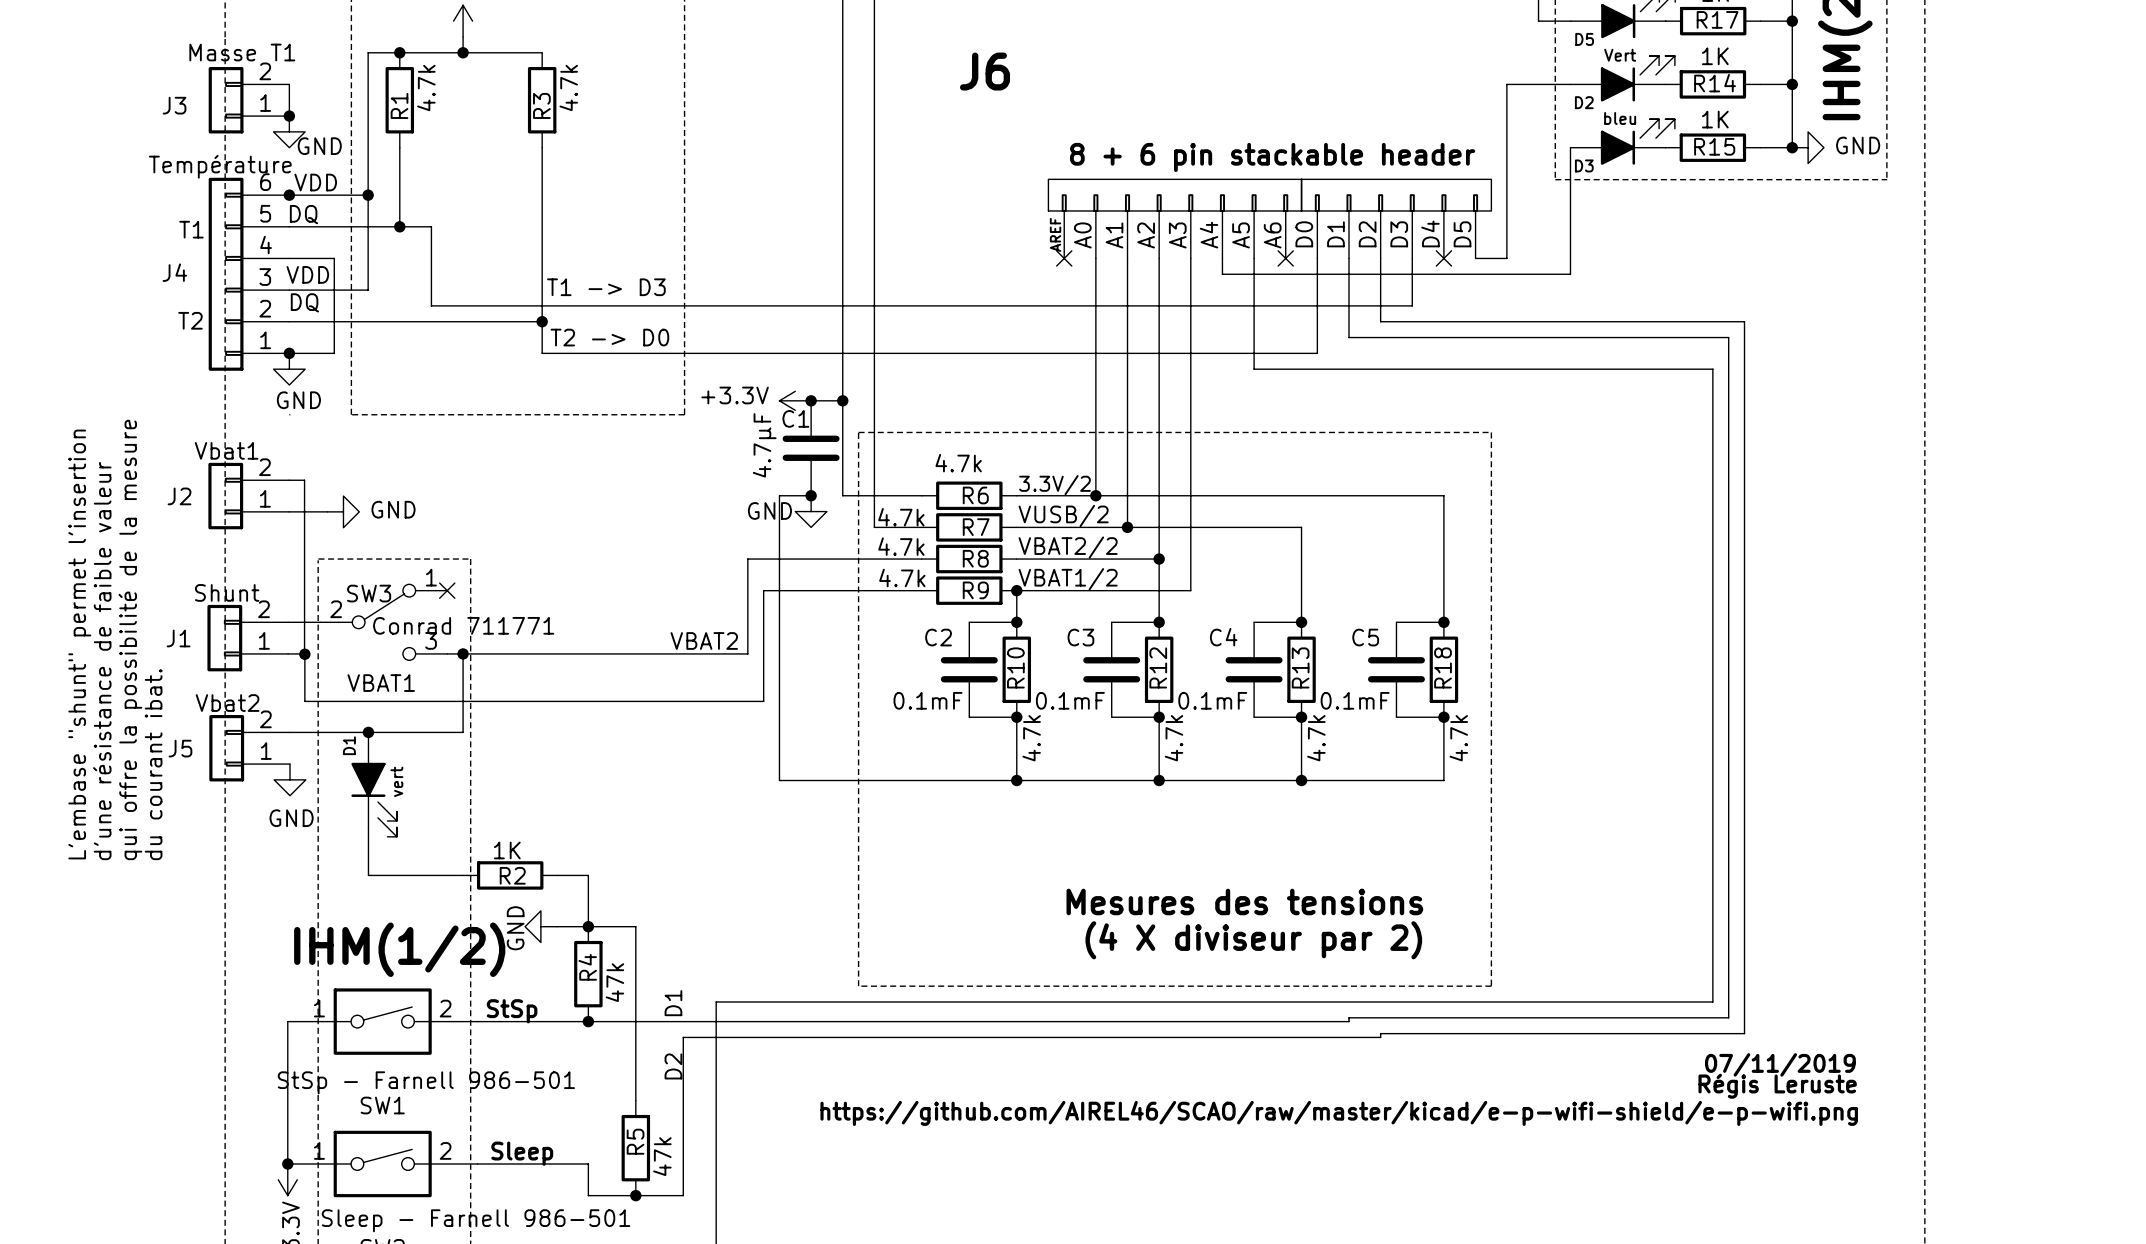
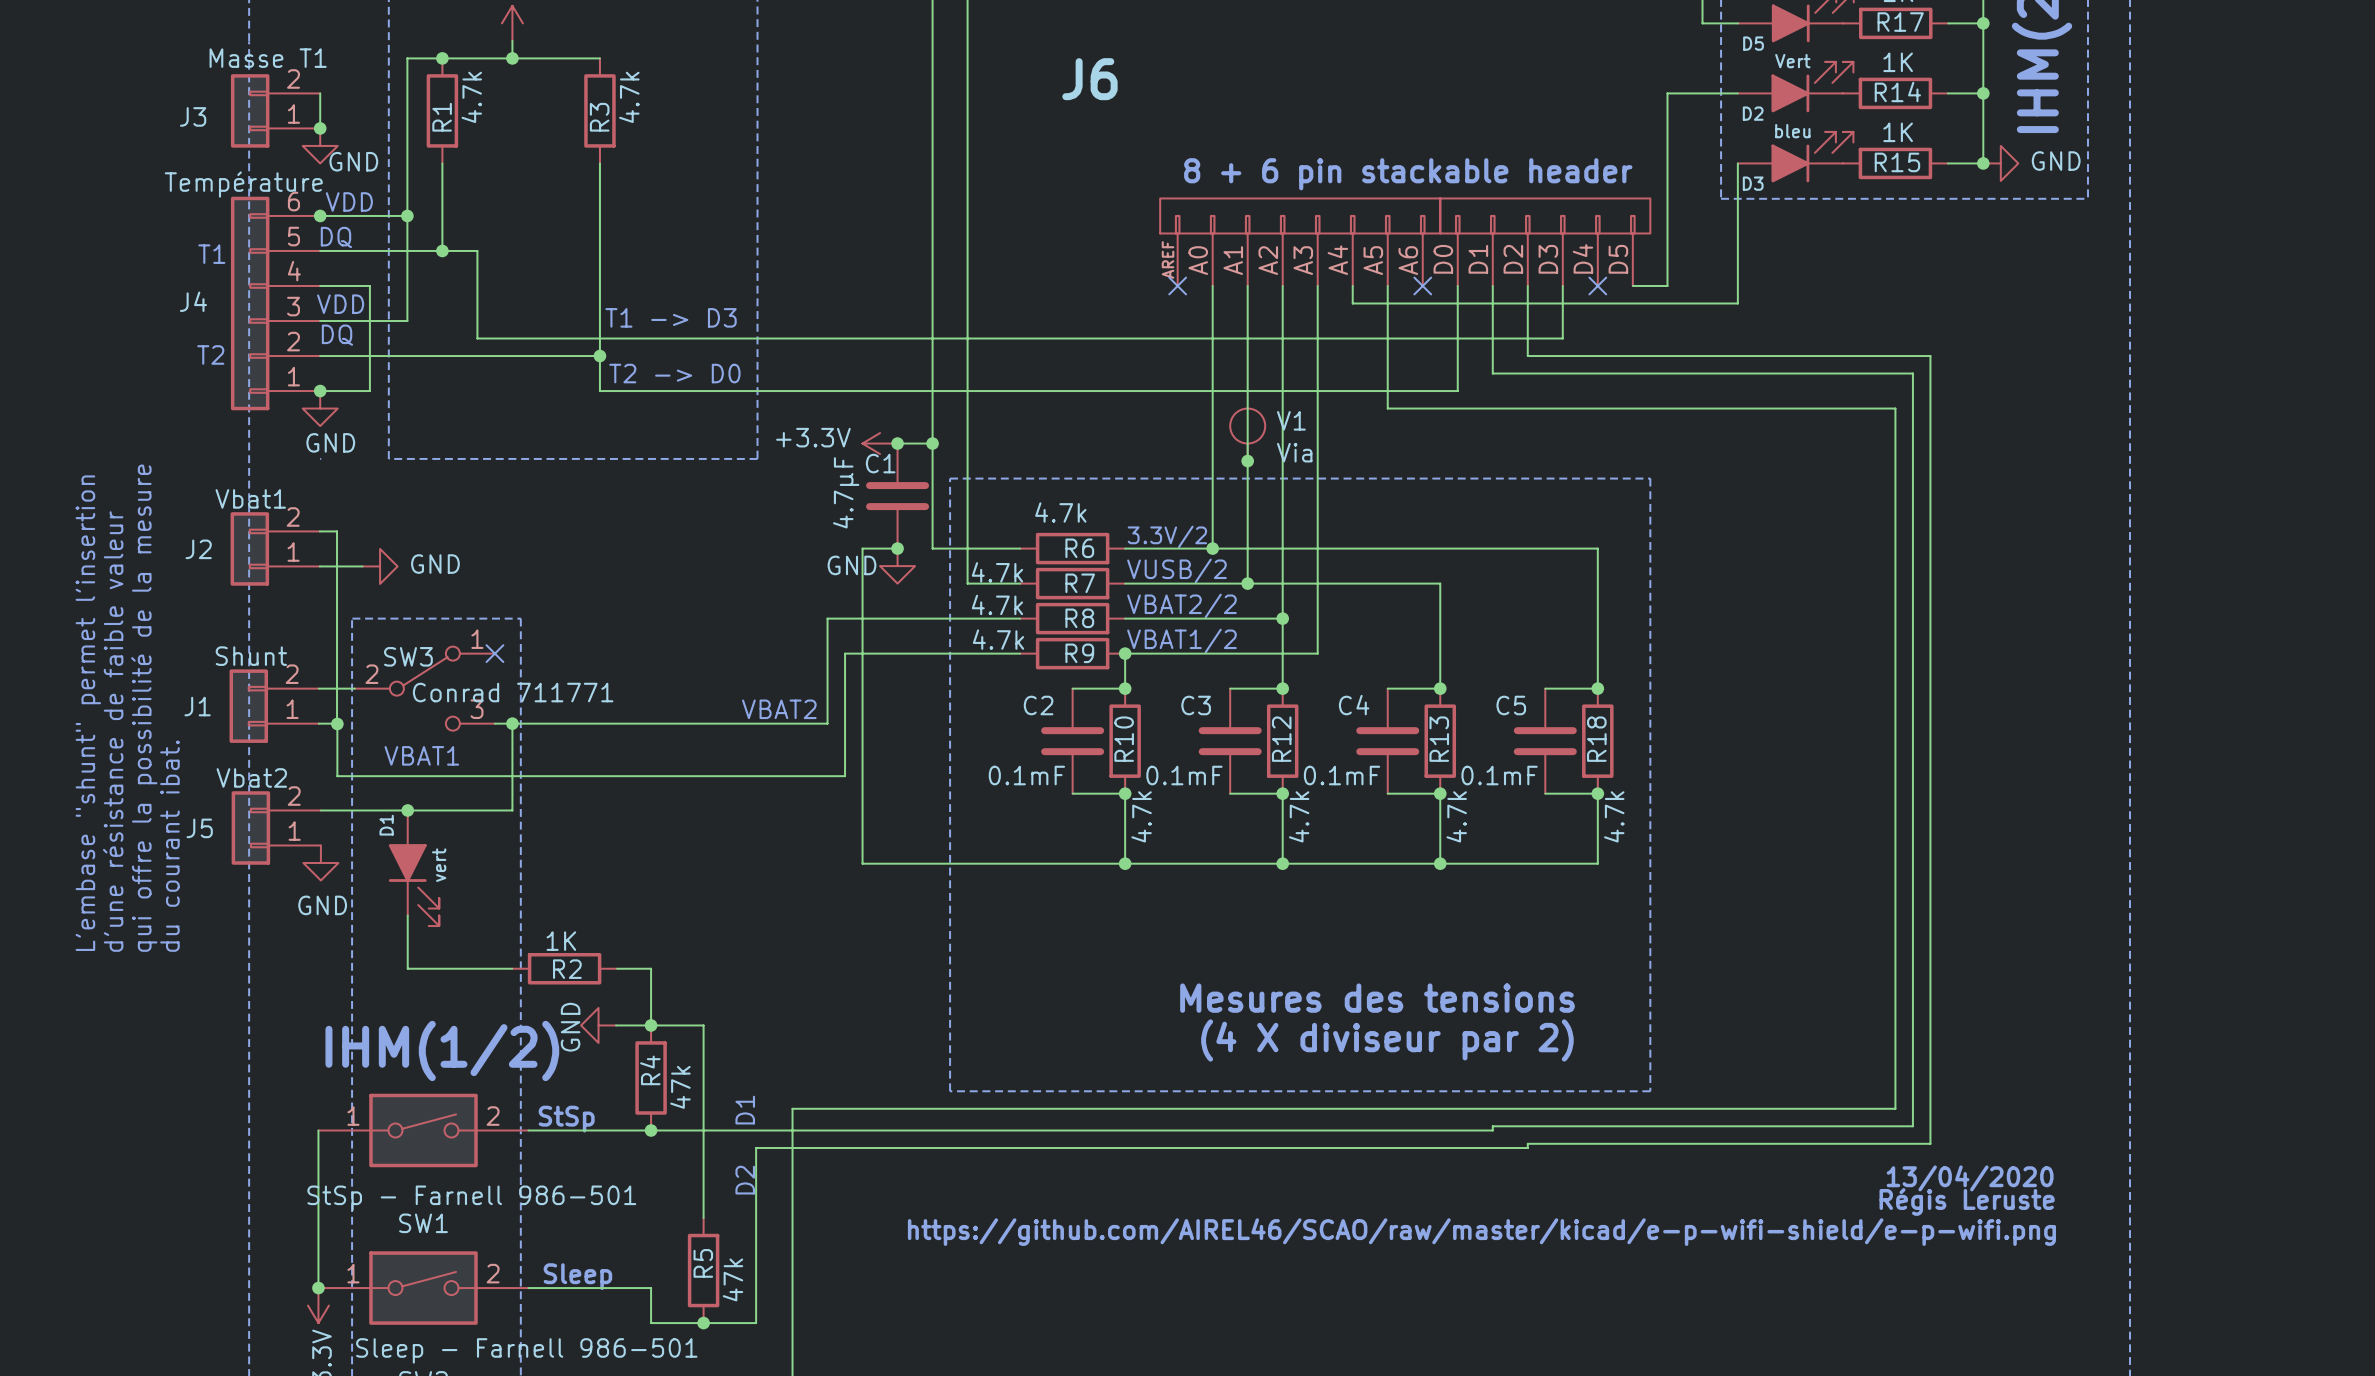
V1: none -> Via (1247, 434)
junction: none -> (1247, 461)
text: 07/11/2019 (1780, 1064) -> 13/04/2020 (1970, 1178)

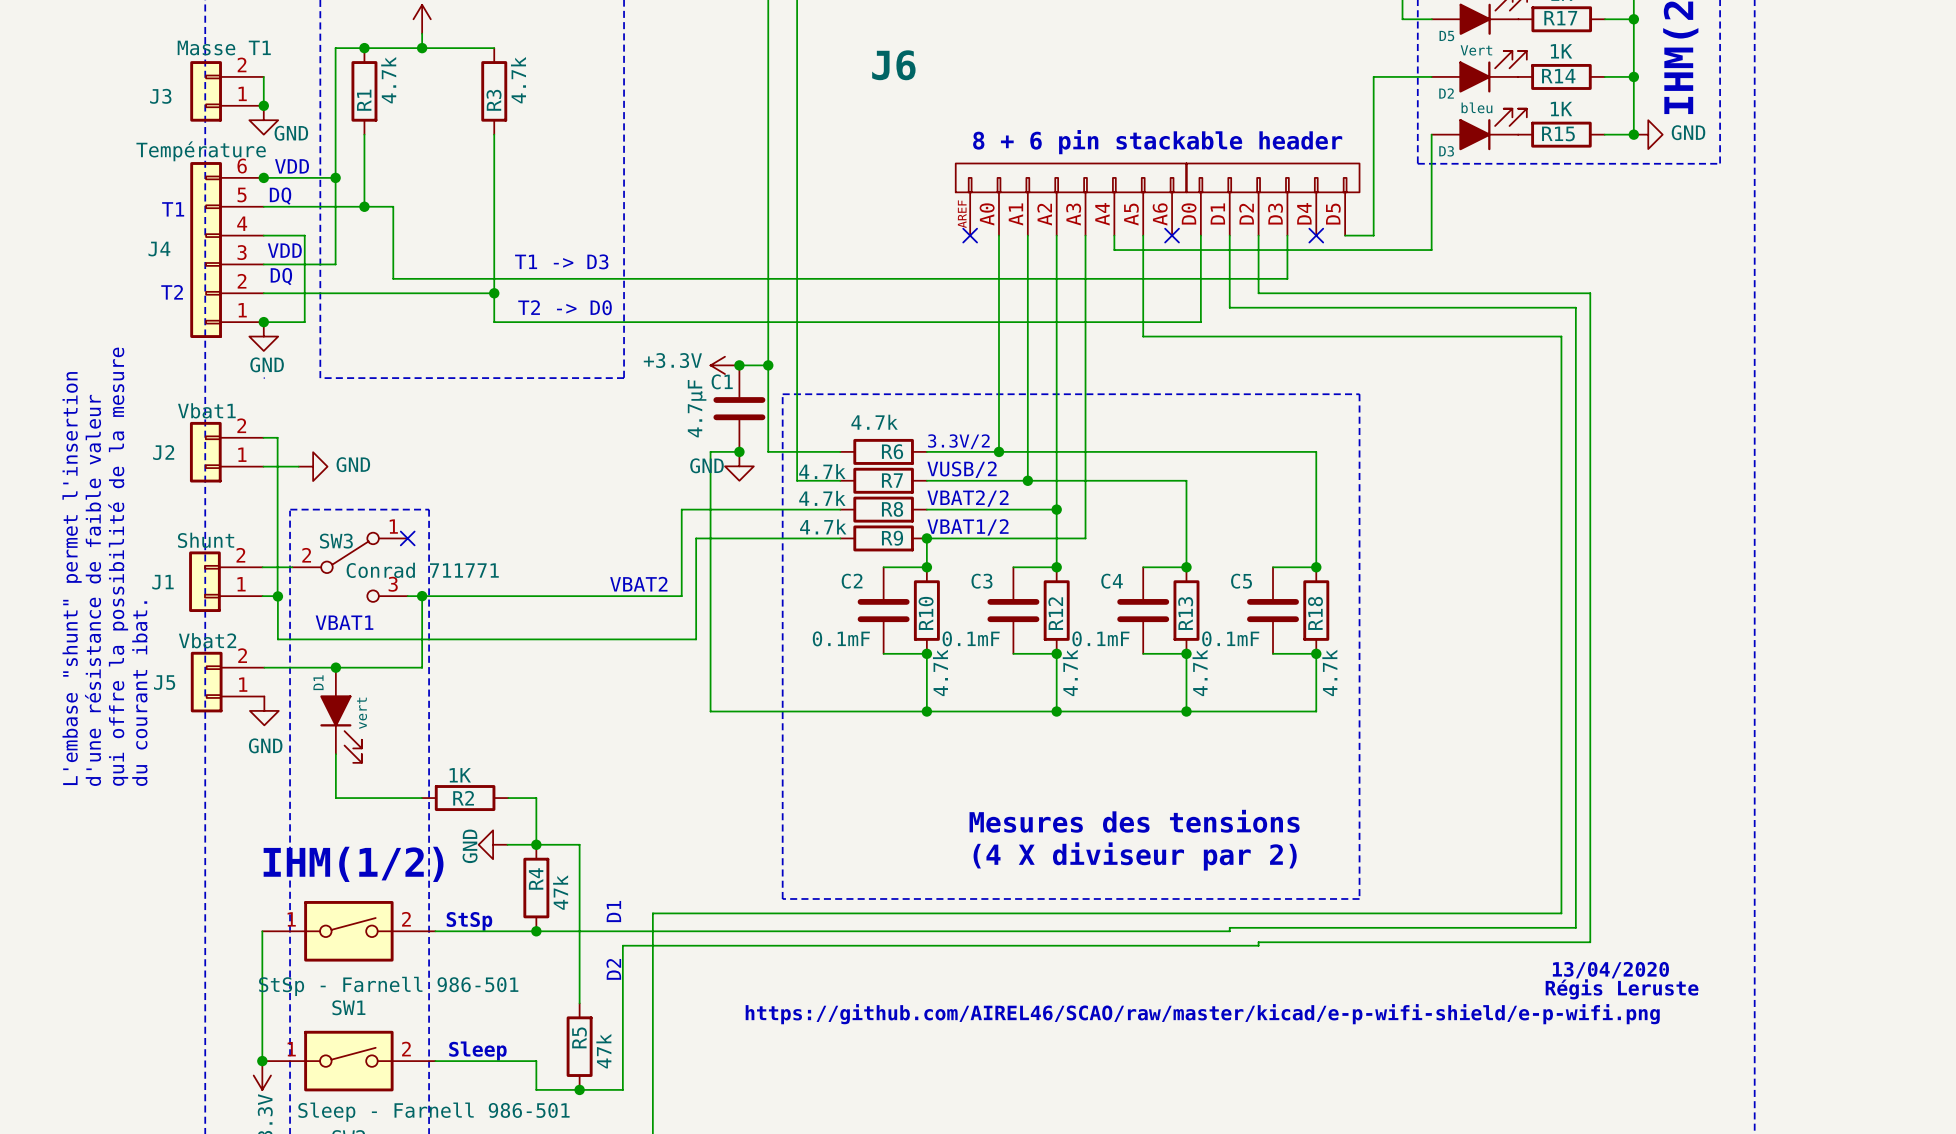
V1: Via (1247, 434) -> none
junction: (1247, 461) -> none

